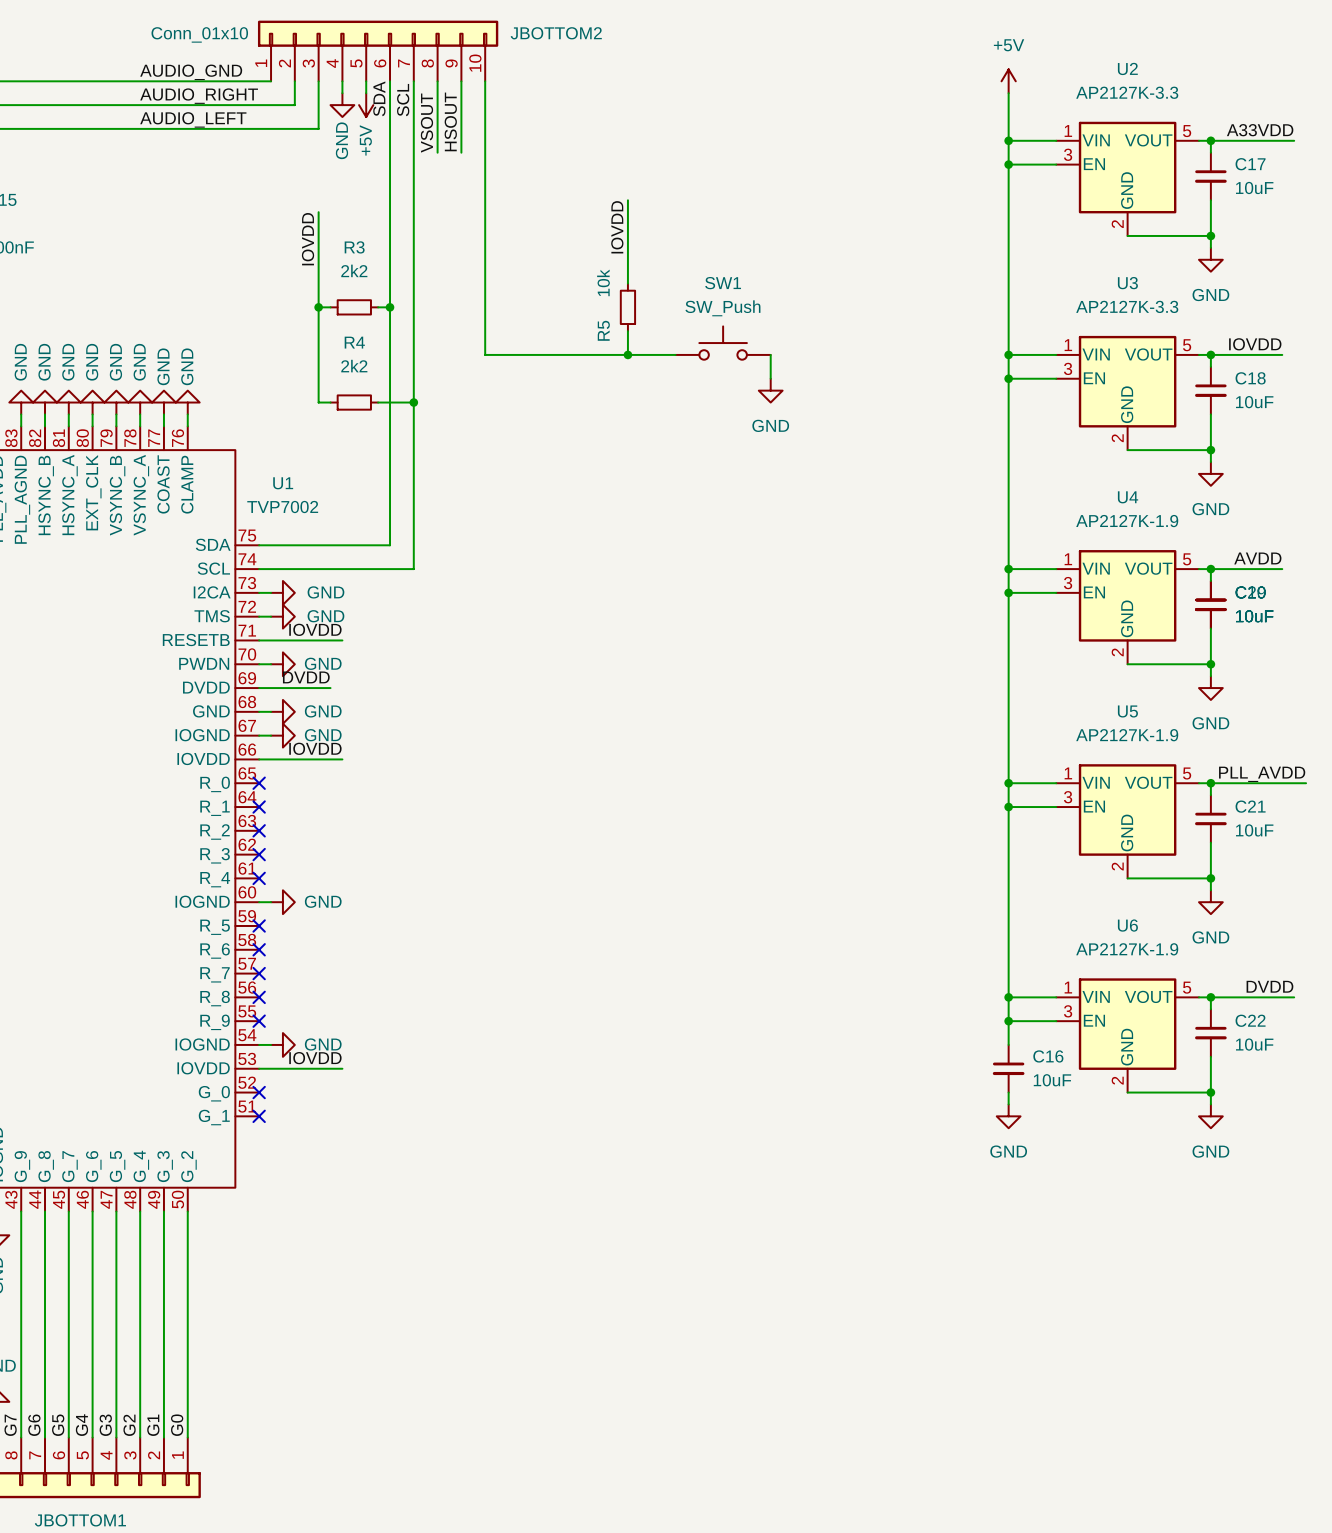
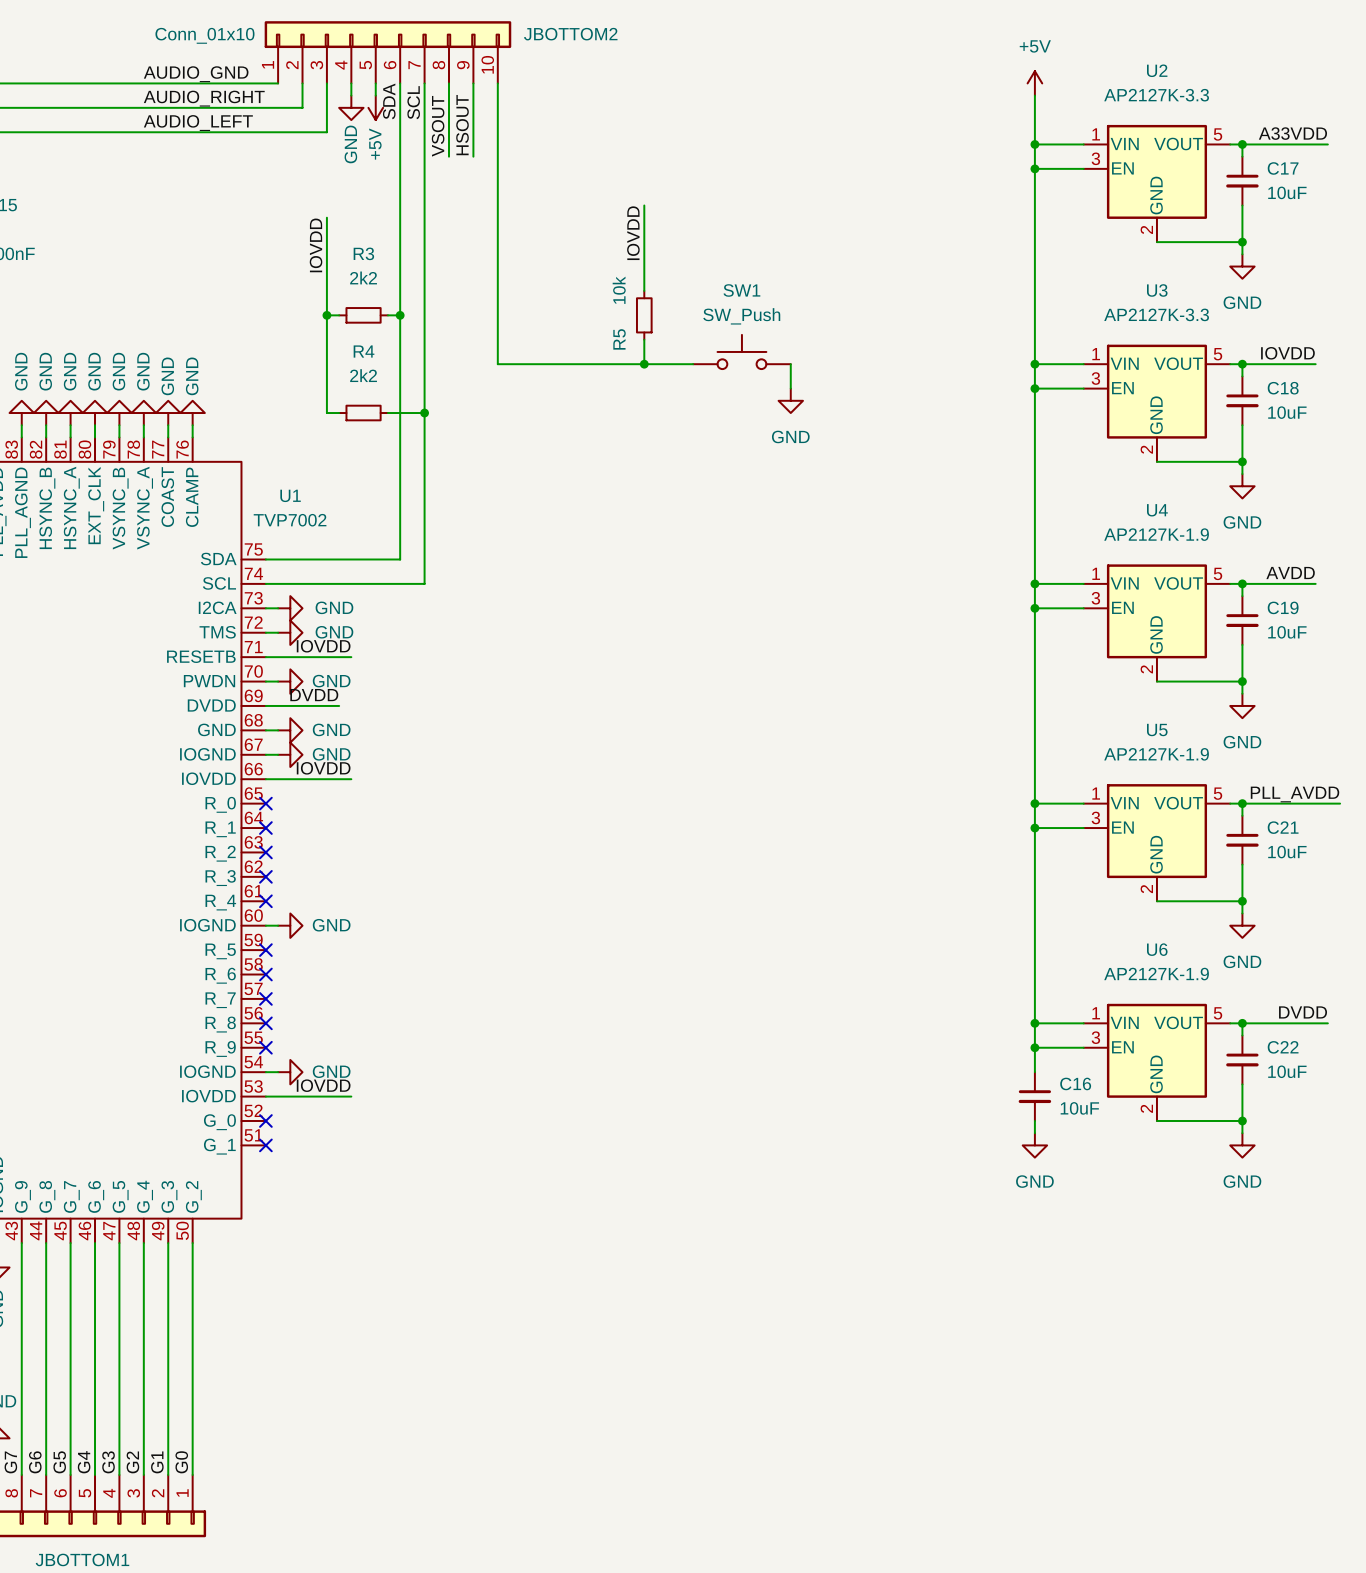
part: 10uF (1210, 604) -> none

